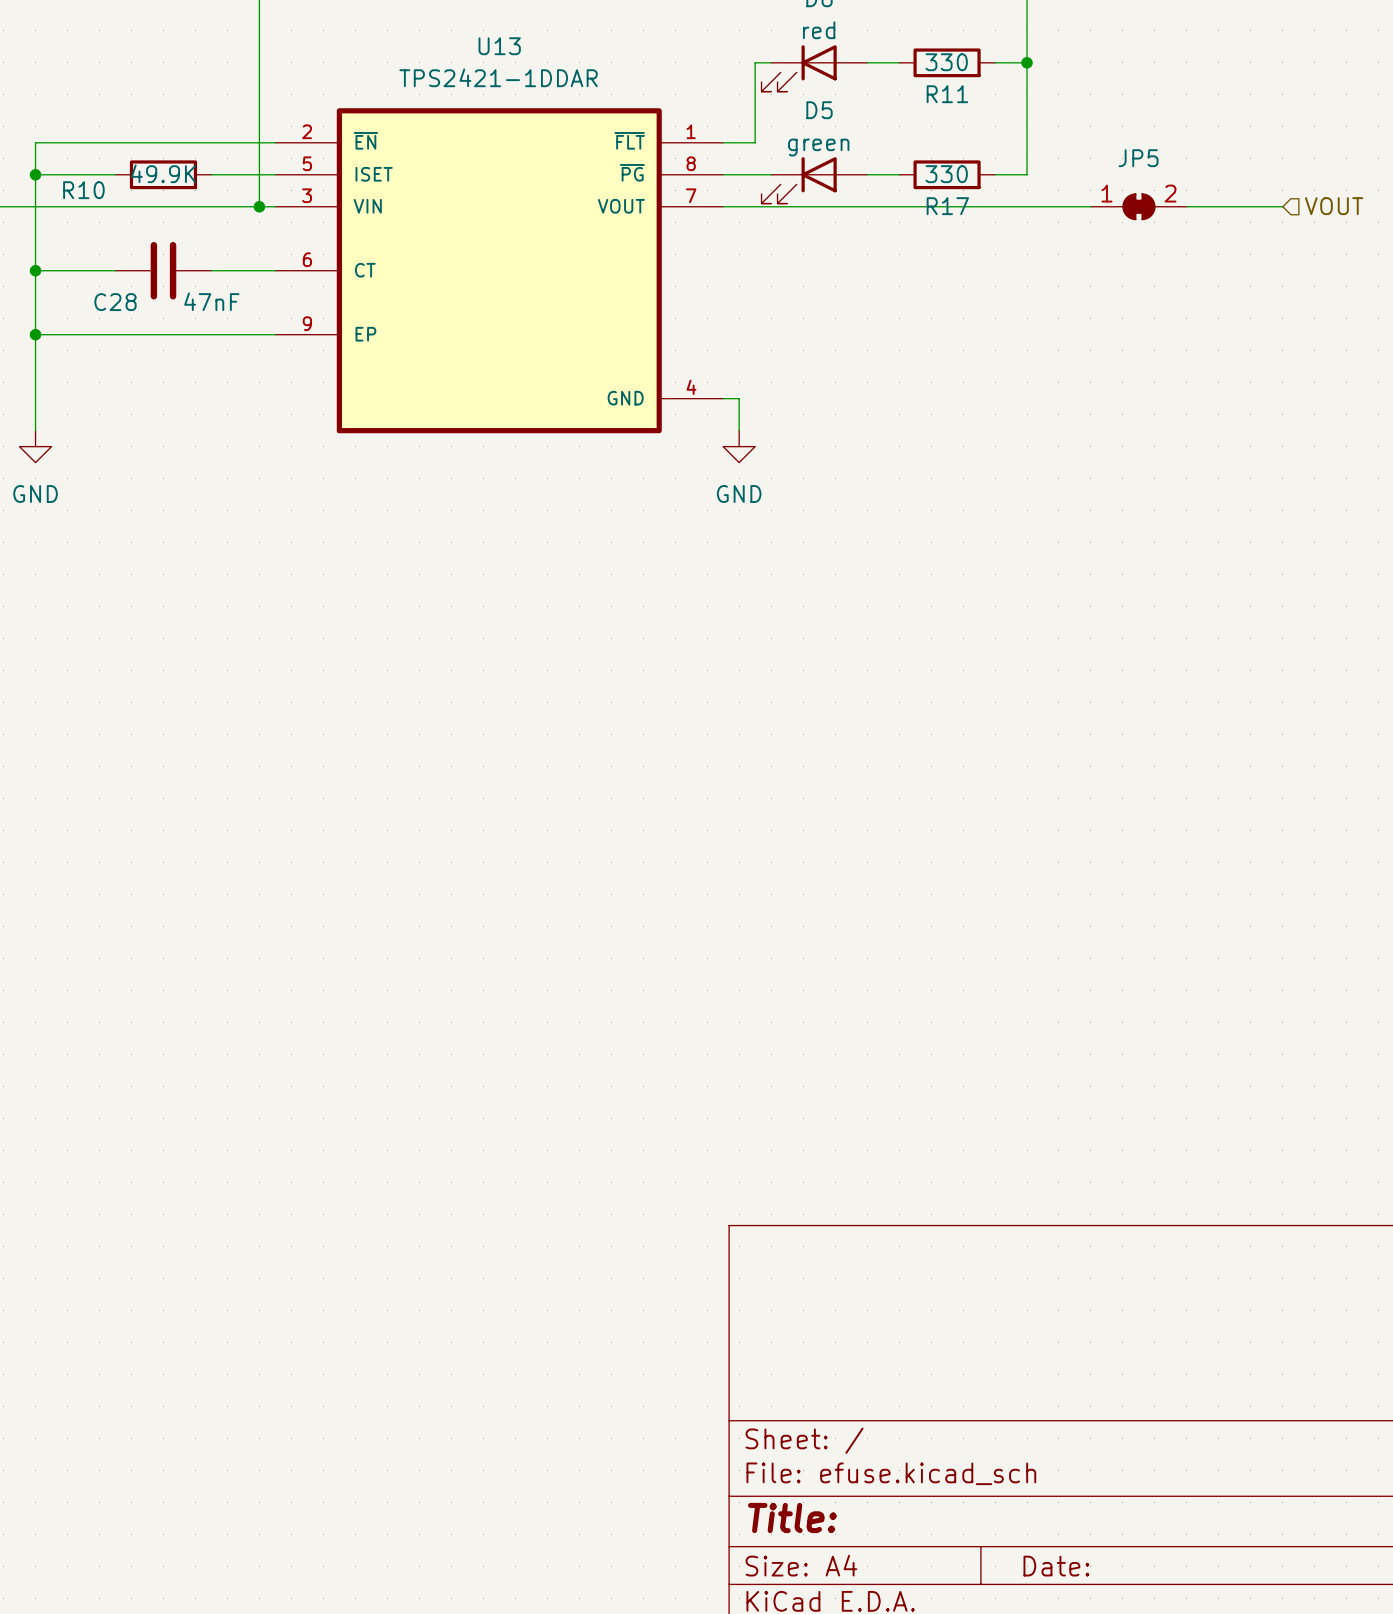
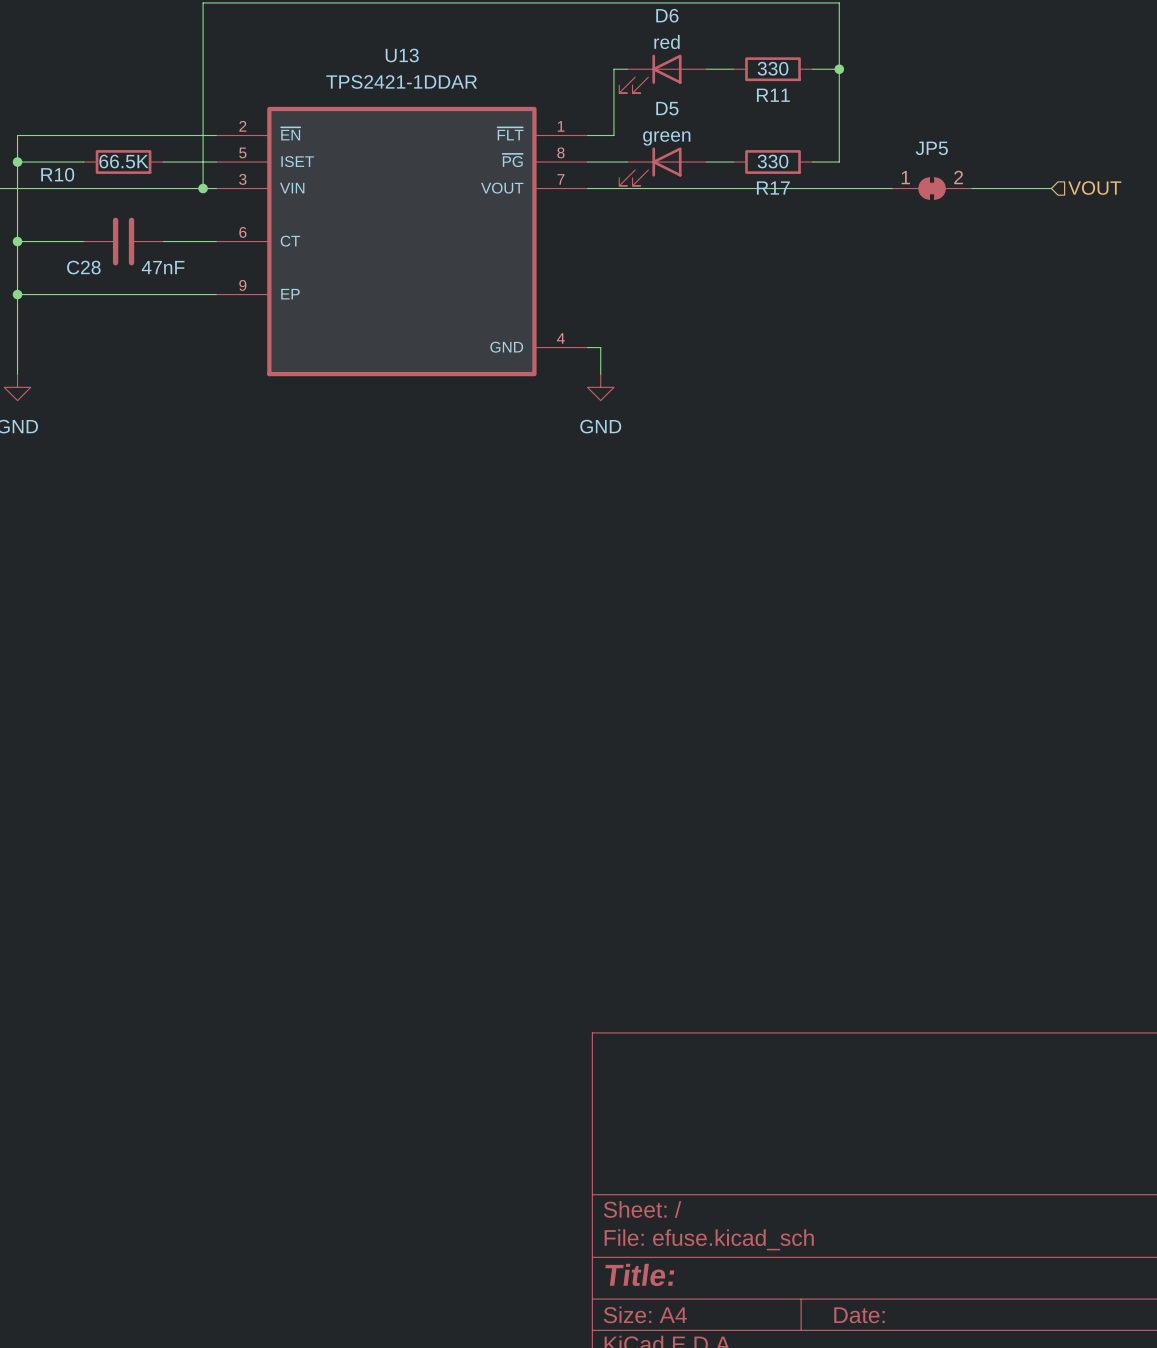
R10 value: 49.9K (163, 173) -> 66.5K (123, 161)

